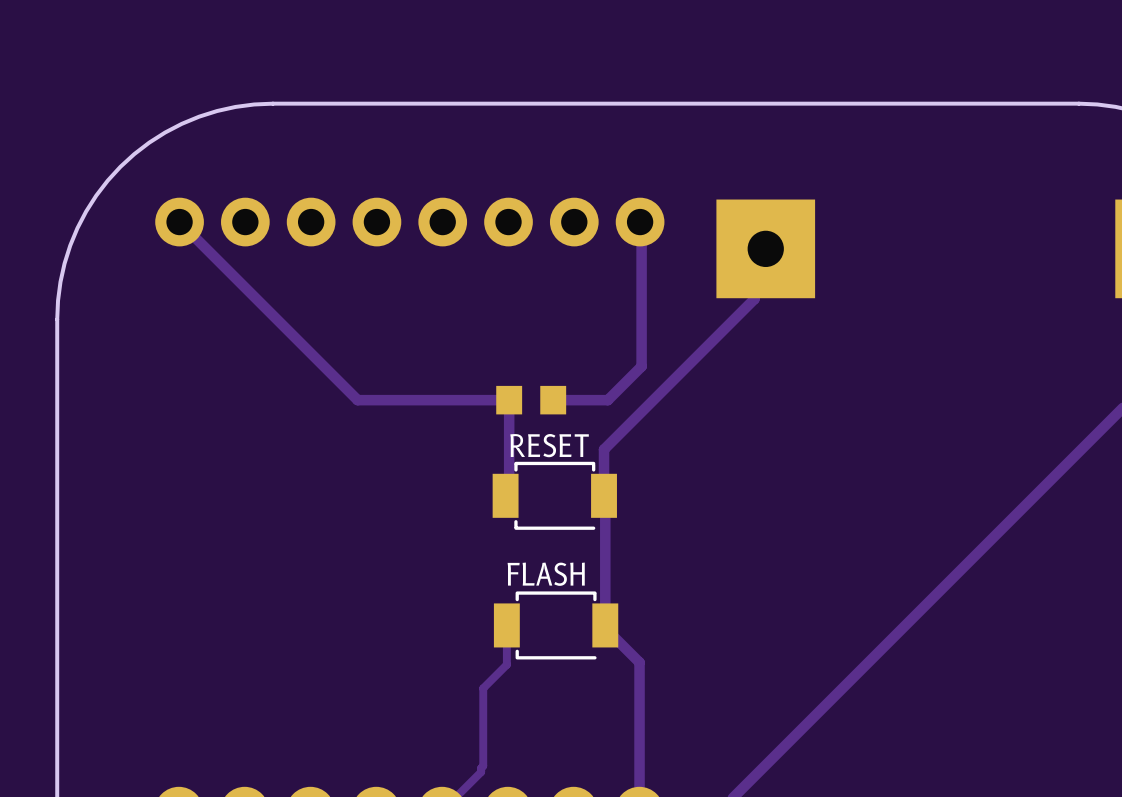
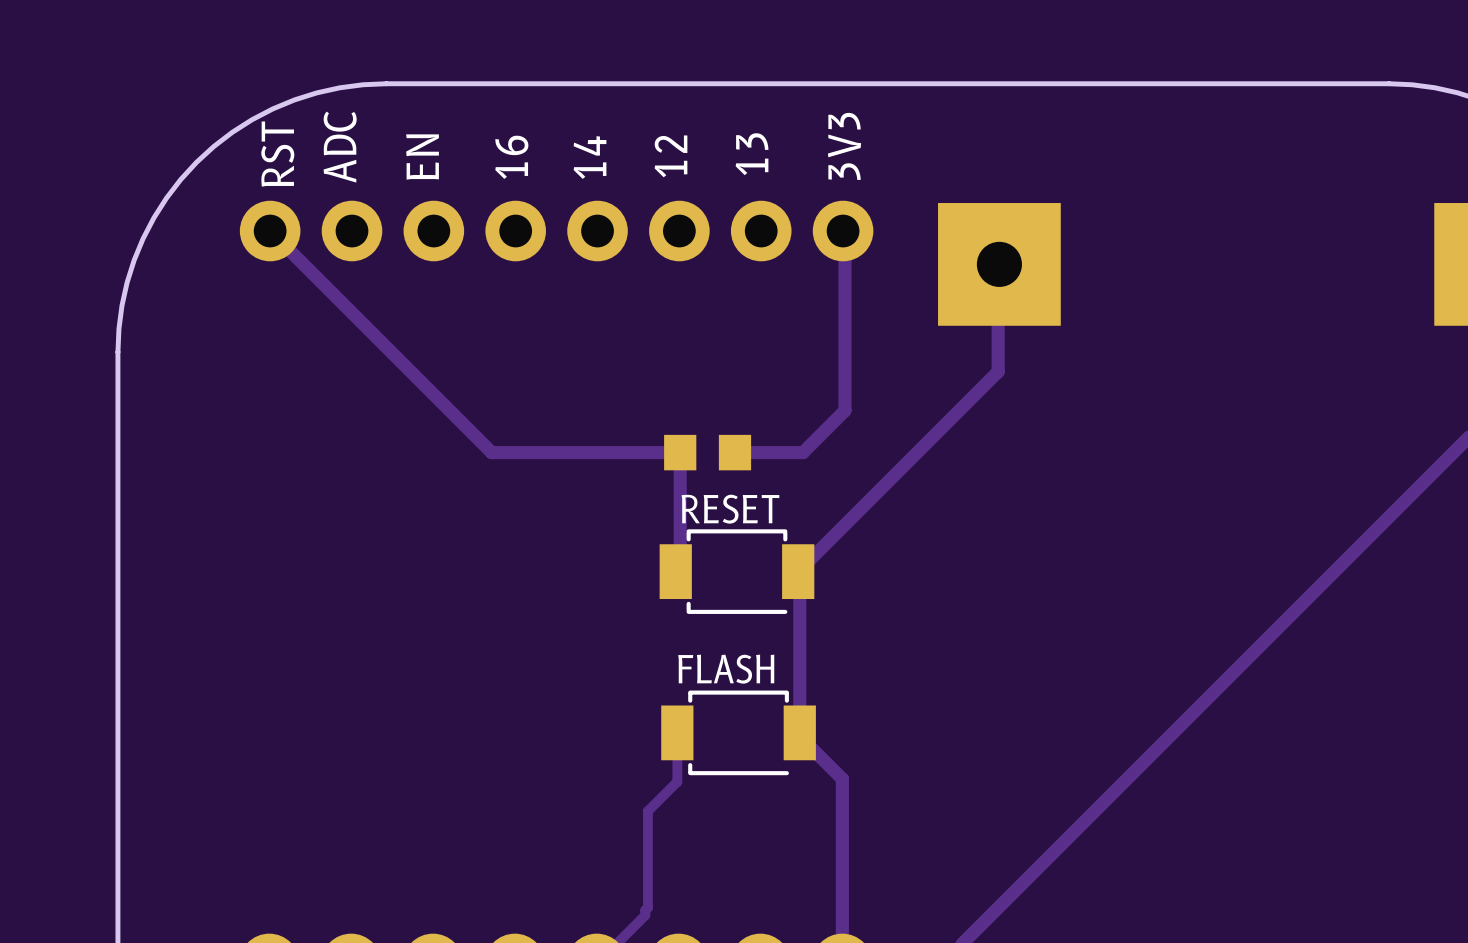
text: none -> ADC (340, 147)
text: none -> 3V3 (844, 146)
text: none -> RST (277, 154)
text: none -> 13 (752, 154)
text: none -> EN (422, 157)
text: none -> 16 (511, 157)
text: none -> 12 (671, 156)
text: none -> 14 (590, 157)
track: (765, 248) (754, 260) (754, 299) (604, 449) (605, 497) -> (998, 244) (998, 371) (798, 571) (799, 573)

